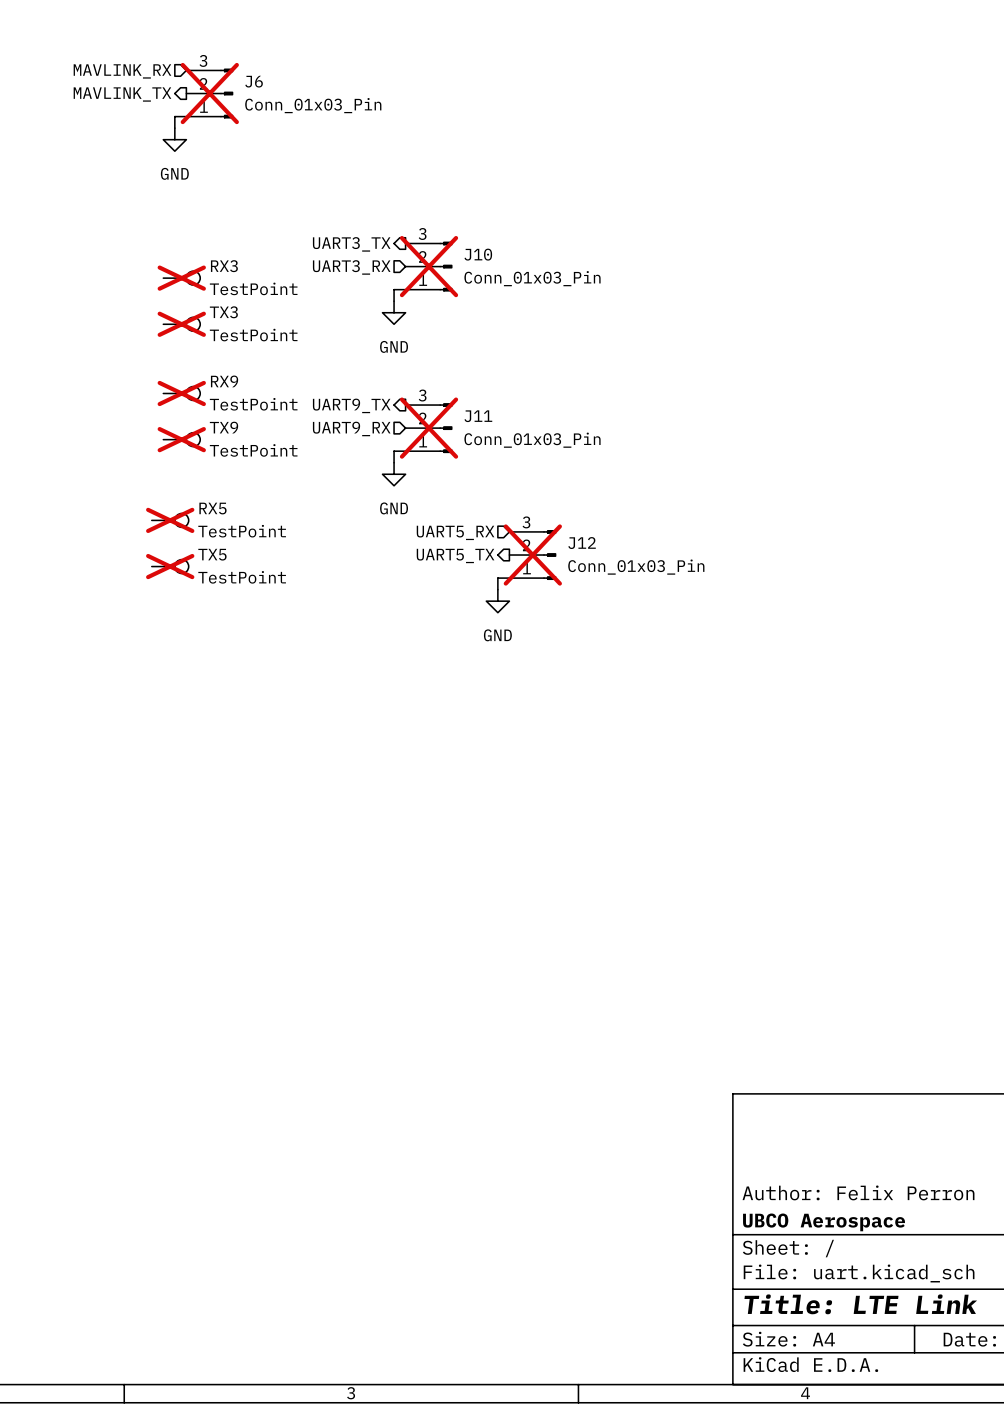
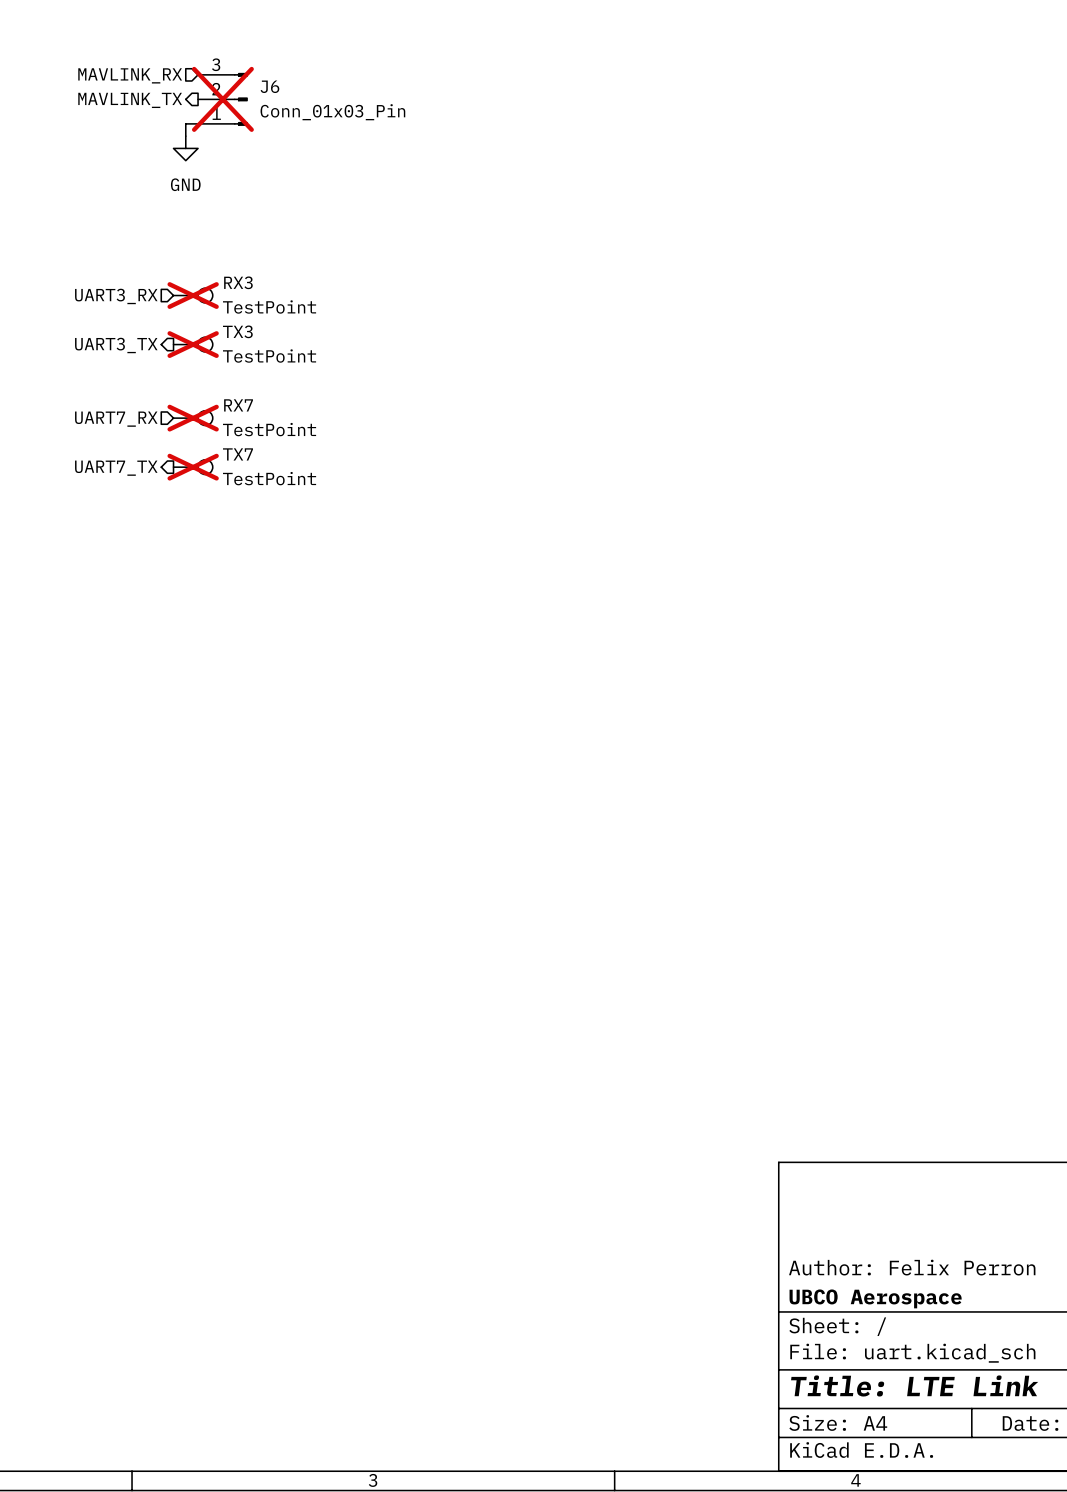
hierarchical label: UART3_TX (351, 244) -> none
J10: Conn_01x03_Pin (429, 266) -> none
hierarchical label: UART3_RX (351, 267) -> none
hierarchical label: none -> UART3_RX (116, 296)
wire: (405, 289) (394, 289) (394, 301) -> none
power symbol: GND (394, 312) -> none
hierarchical label: none -> UART3_TX (116, 345)
RX9 name: RX9 (224, 381) -> RX7 (238, 405)
hierarchical label: none -> UART7_RX (116, 419)
hierarchical label: UART9_TX (351, 405) -> none
TX9 name: TX9 (224, 427) -> TX7 (237, 454)
hierarchical label: UART9_RX (351, 428) -> none
J11: Conn_01x03_Pin (429, 428) -> none
hierarchical label: none -> UART7_TX (116, 468)
wire: (405, 451) (394, 451) (394, 462) -> none
power symbol: GND (394, 474) -> none
RX5: TestPoint (170, 520) -> none
hierarchical label: UART5_RX (455, 532) -> none
hierarchical label: UART5_TX (455, 555) -> none
J12: Conn_01x03_Pin (532, 555) -> none
TX5: TestPoint (170, 566) -> none
wire: (509, 578) (497, 578) (497, 589) -> none
power symbol: GND (497, 601) -> none

